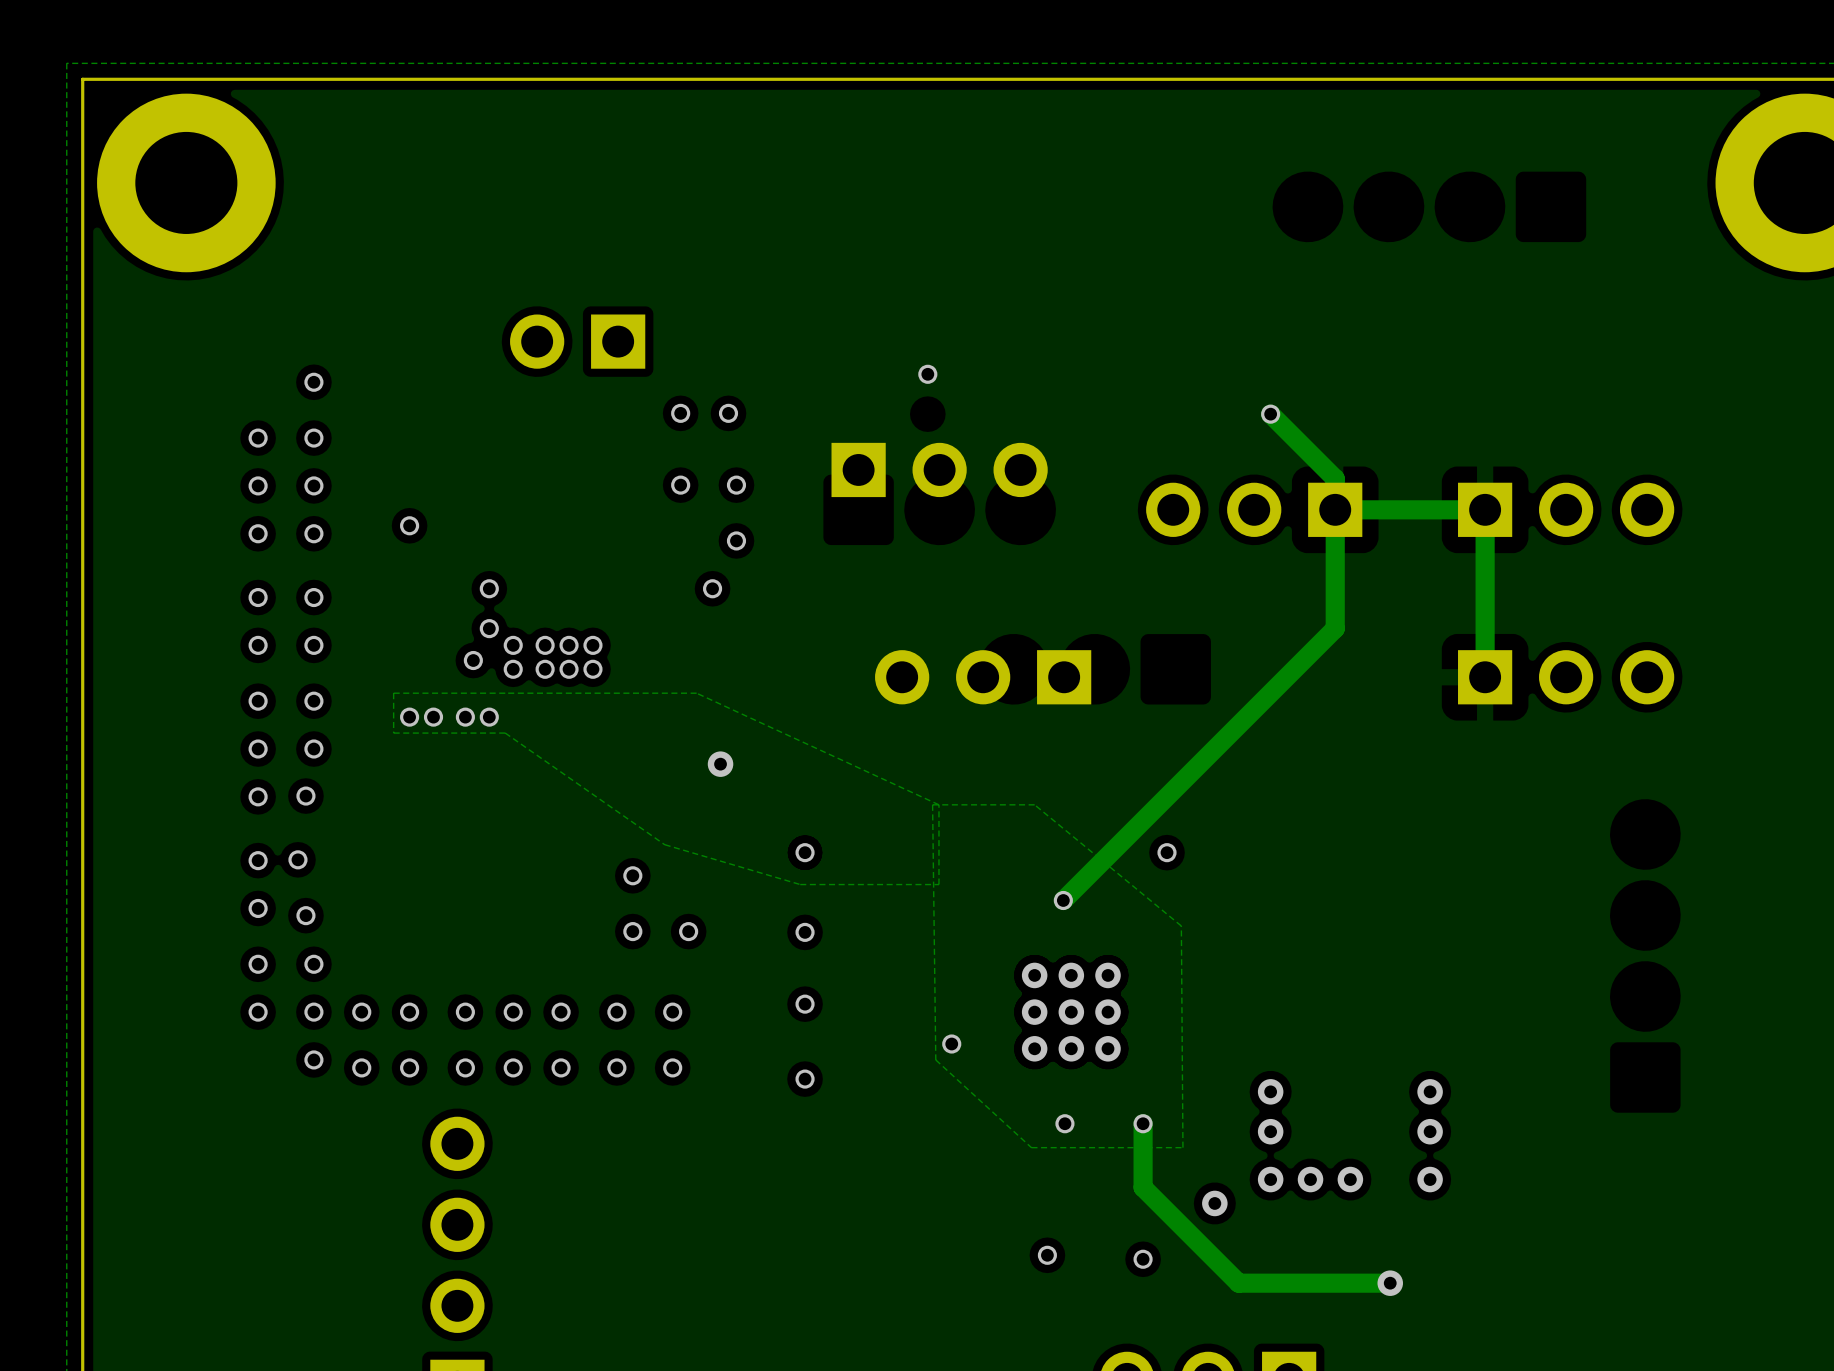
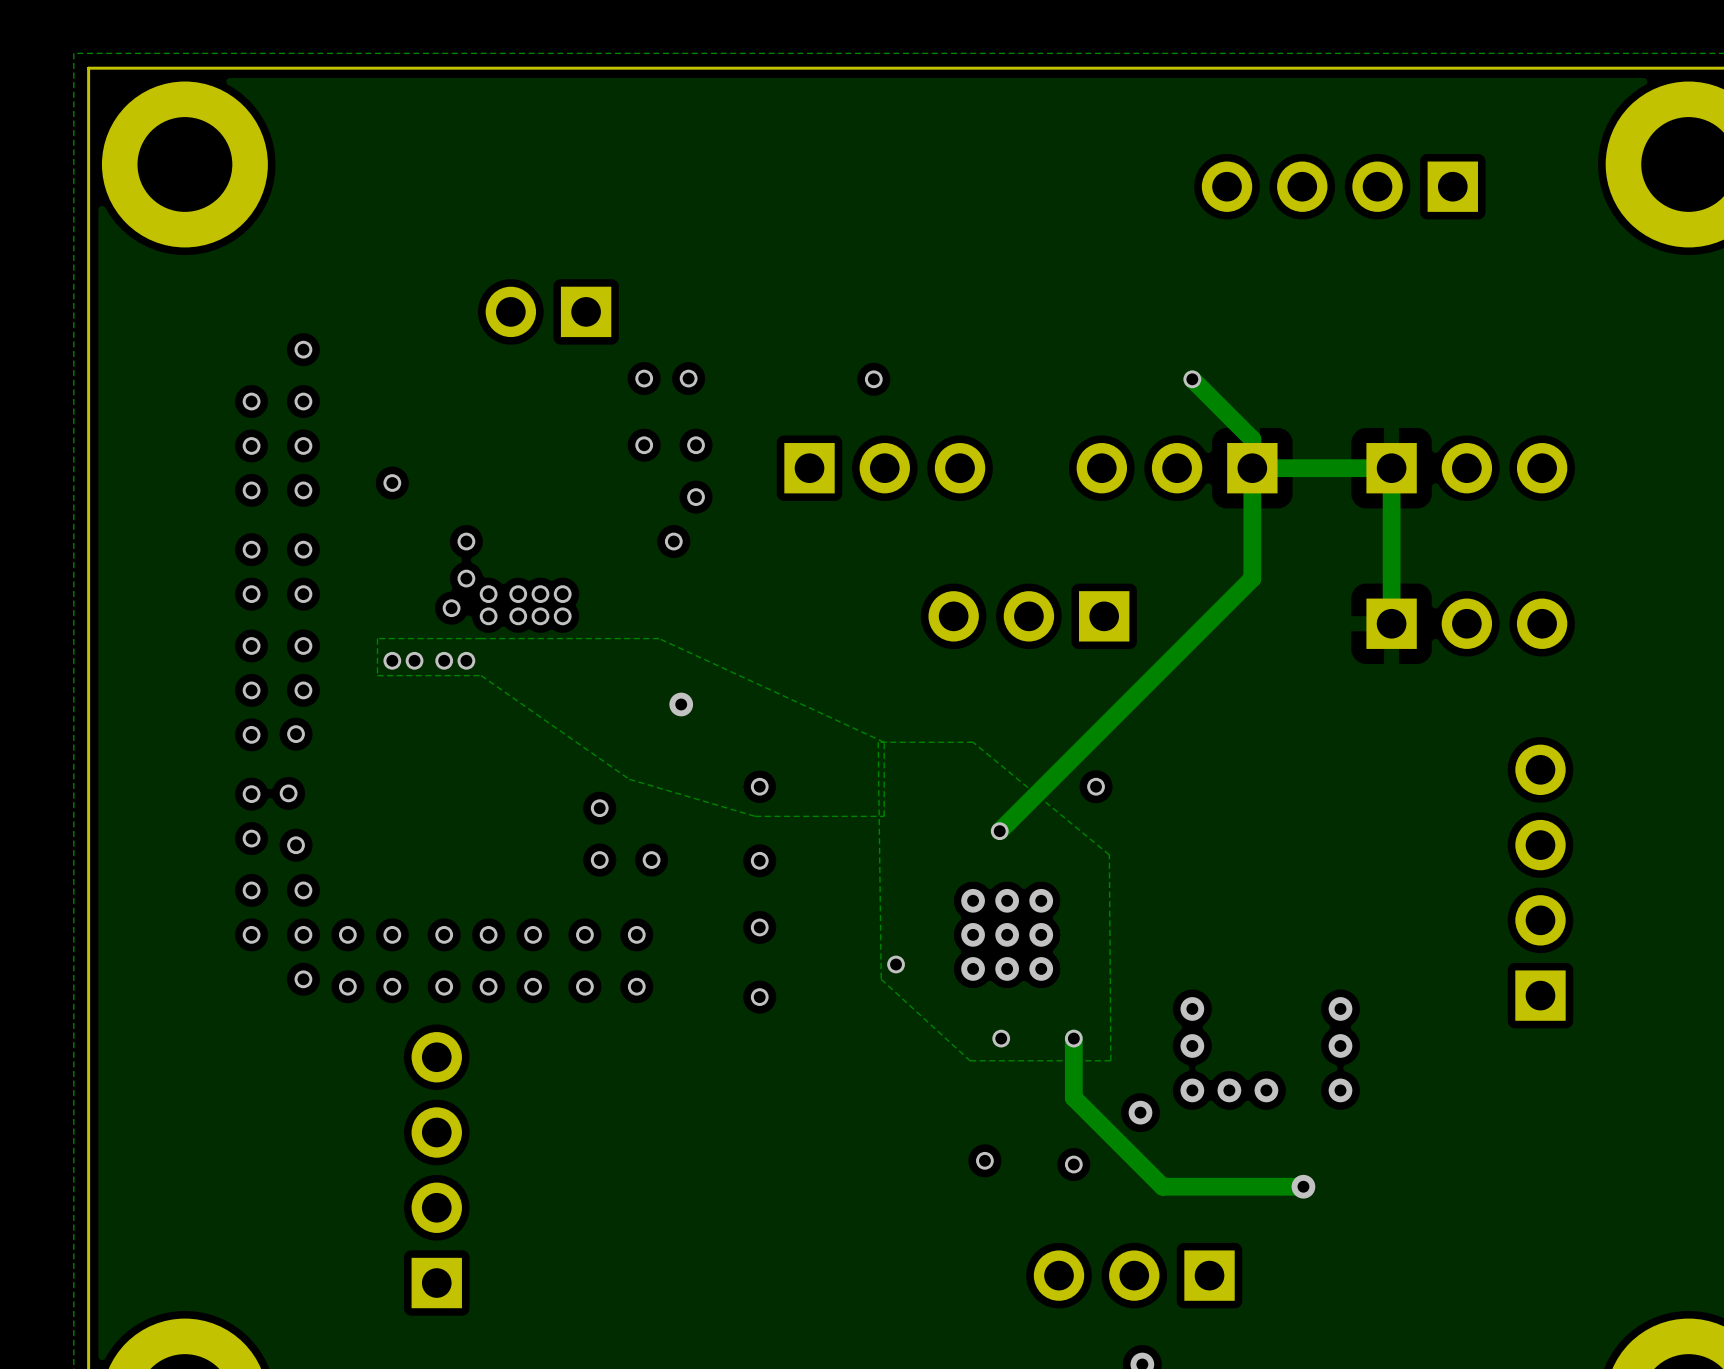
part: none -> (1339, 186)
via position: (927, 374) -> (873, 379)
part position: (939, 469) -> (884, 468)
part: none -> (1028, 616)
part: (983, 677) -> none
part: none -> (1540, 882)

